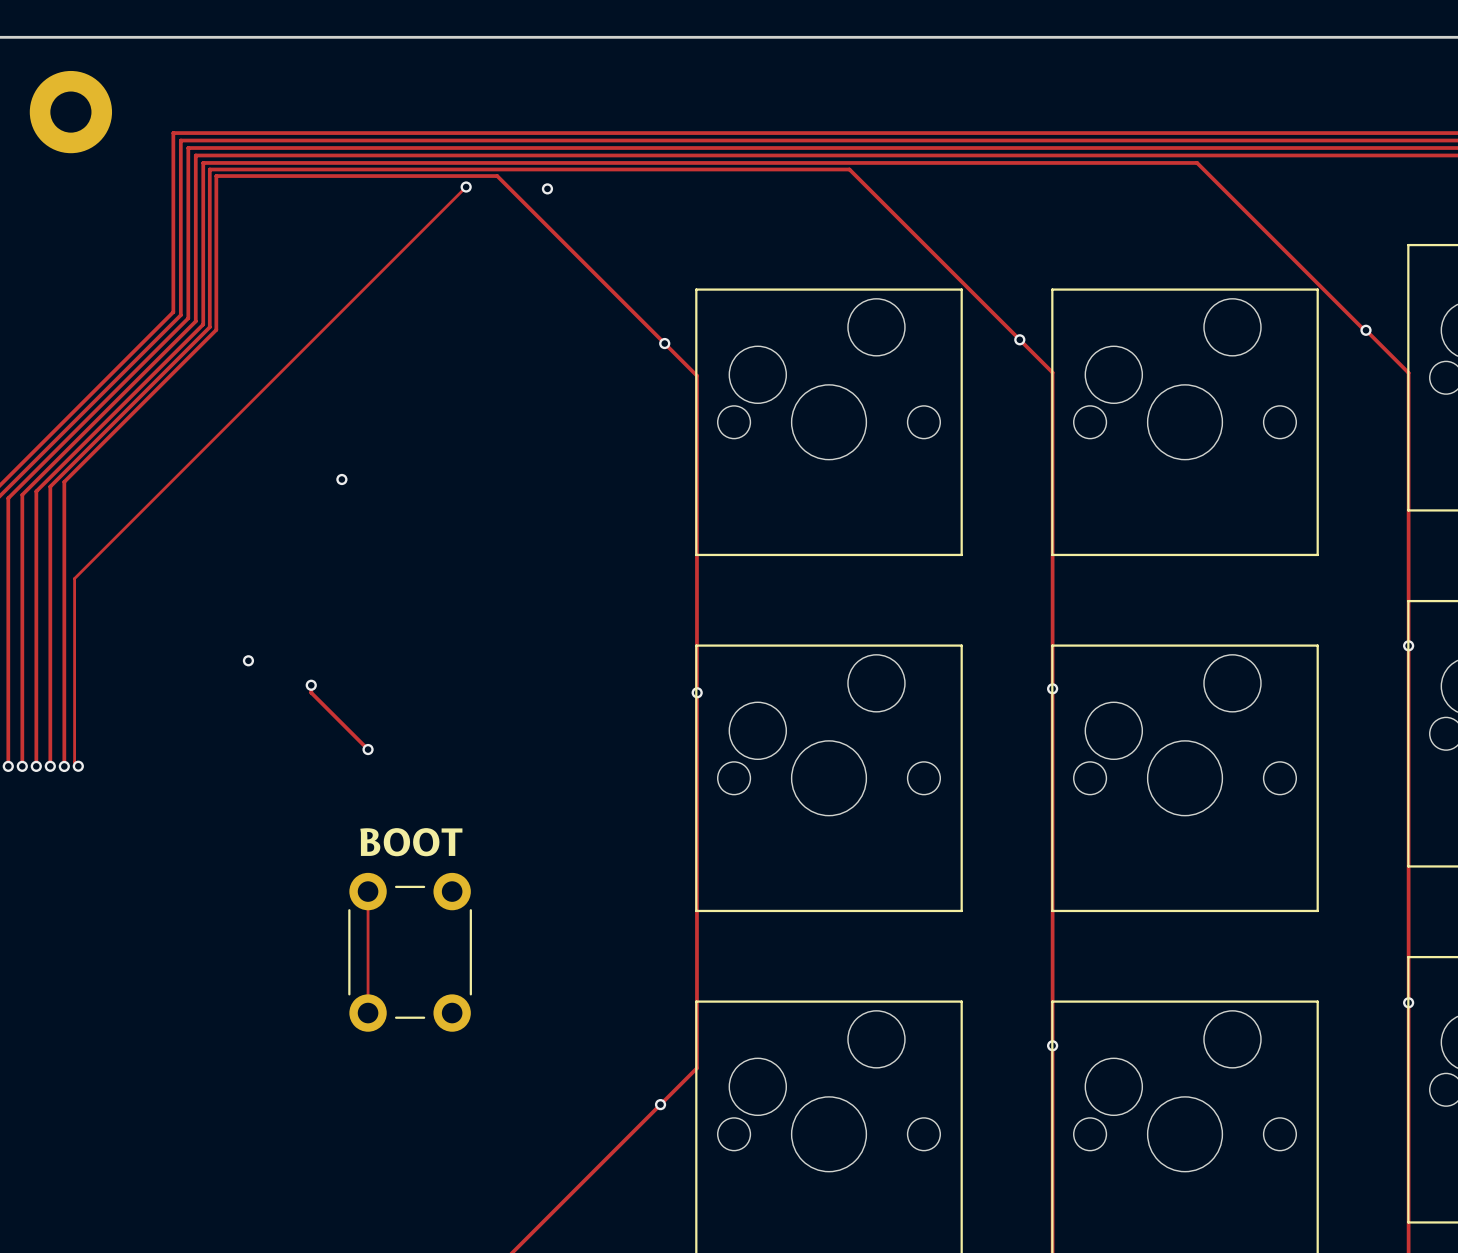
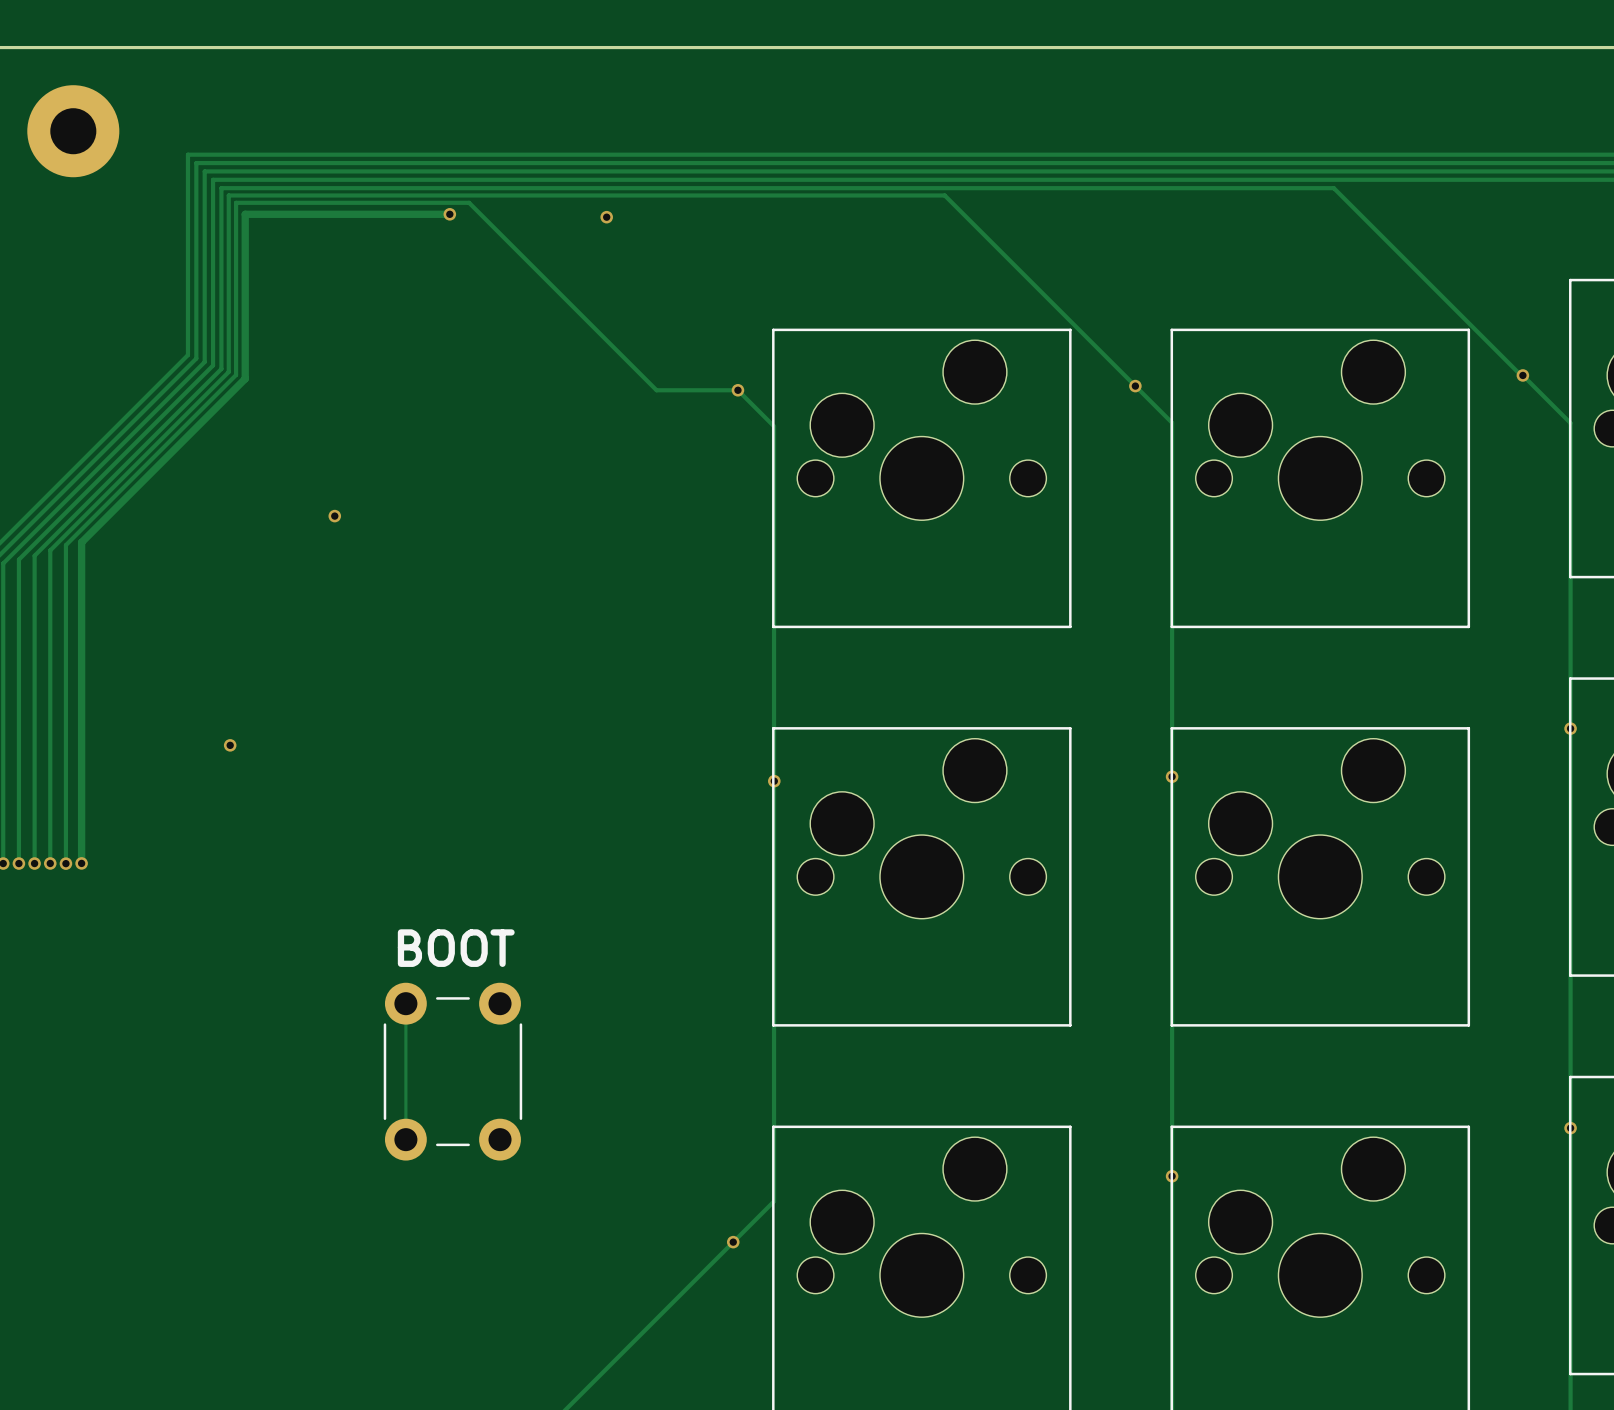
track: (424, 176) (497, 176) (664, 343) -> (469, 202) (656, 390) (737, 390)
track: (466, 187) (74, 578) (74, 762) (78, 766) -> (449, 214) (245, 214) (245, 378) (81, 542) (81, 863)
via position: (466, 187) -> (449, 214)
via position: (341, 479) -> (334, 516)
via position: (248, 660) -> (230, 745)
track: (311, 685) (311, 692) (368, 749) -> none
via: (311, 685) -> none
via: (368, 749) -> none

